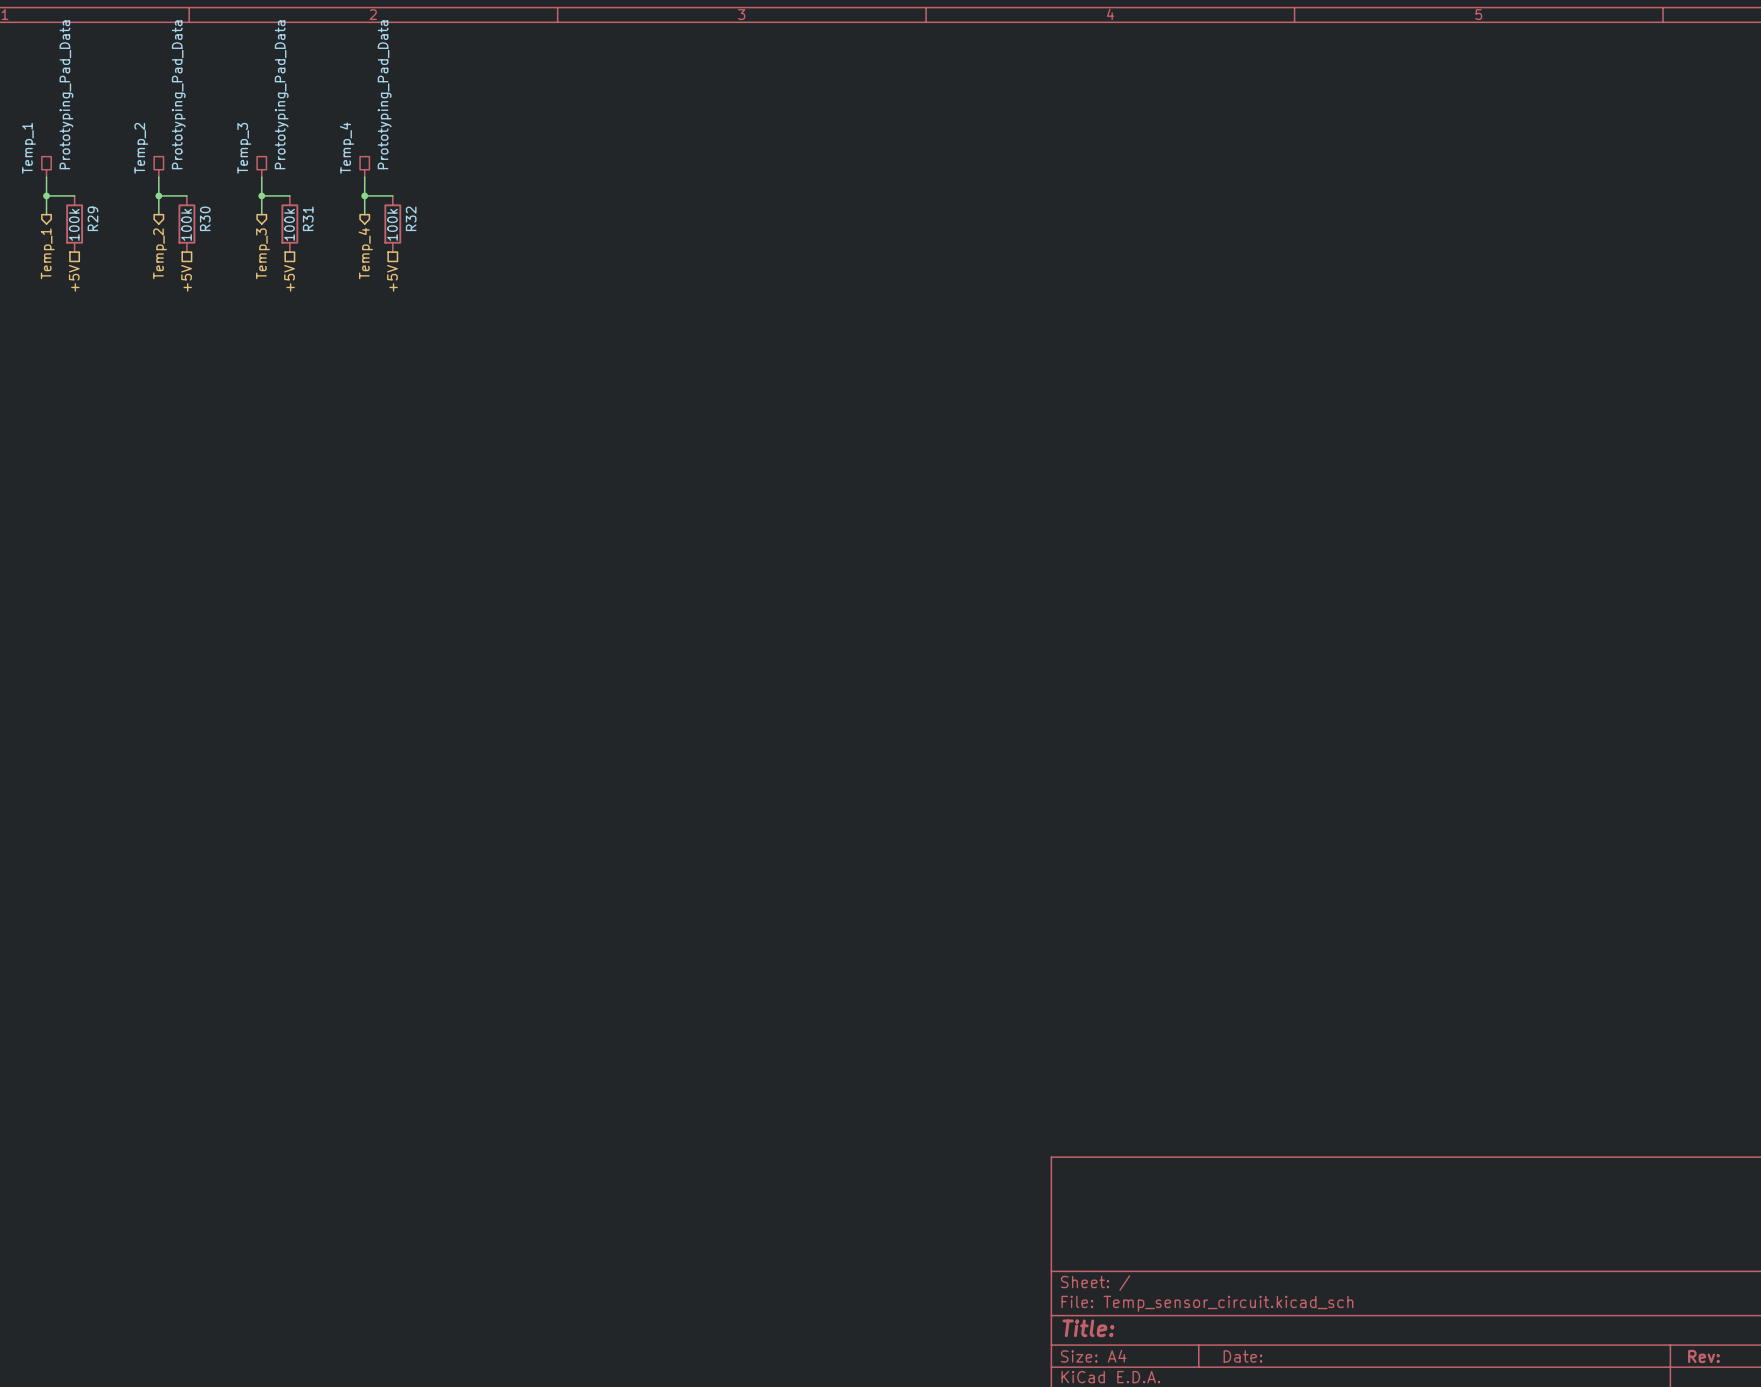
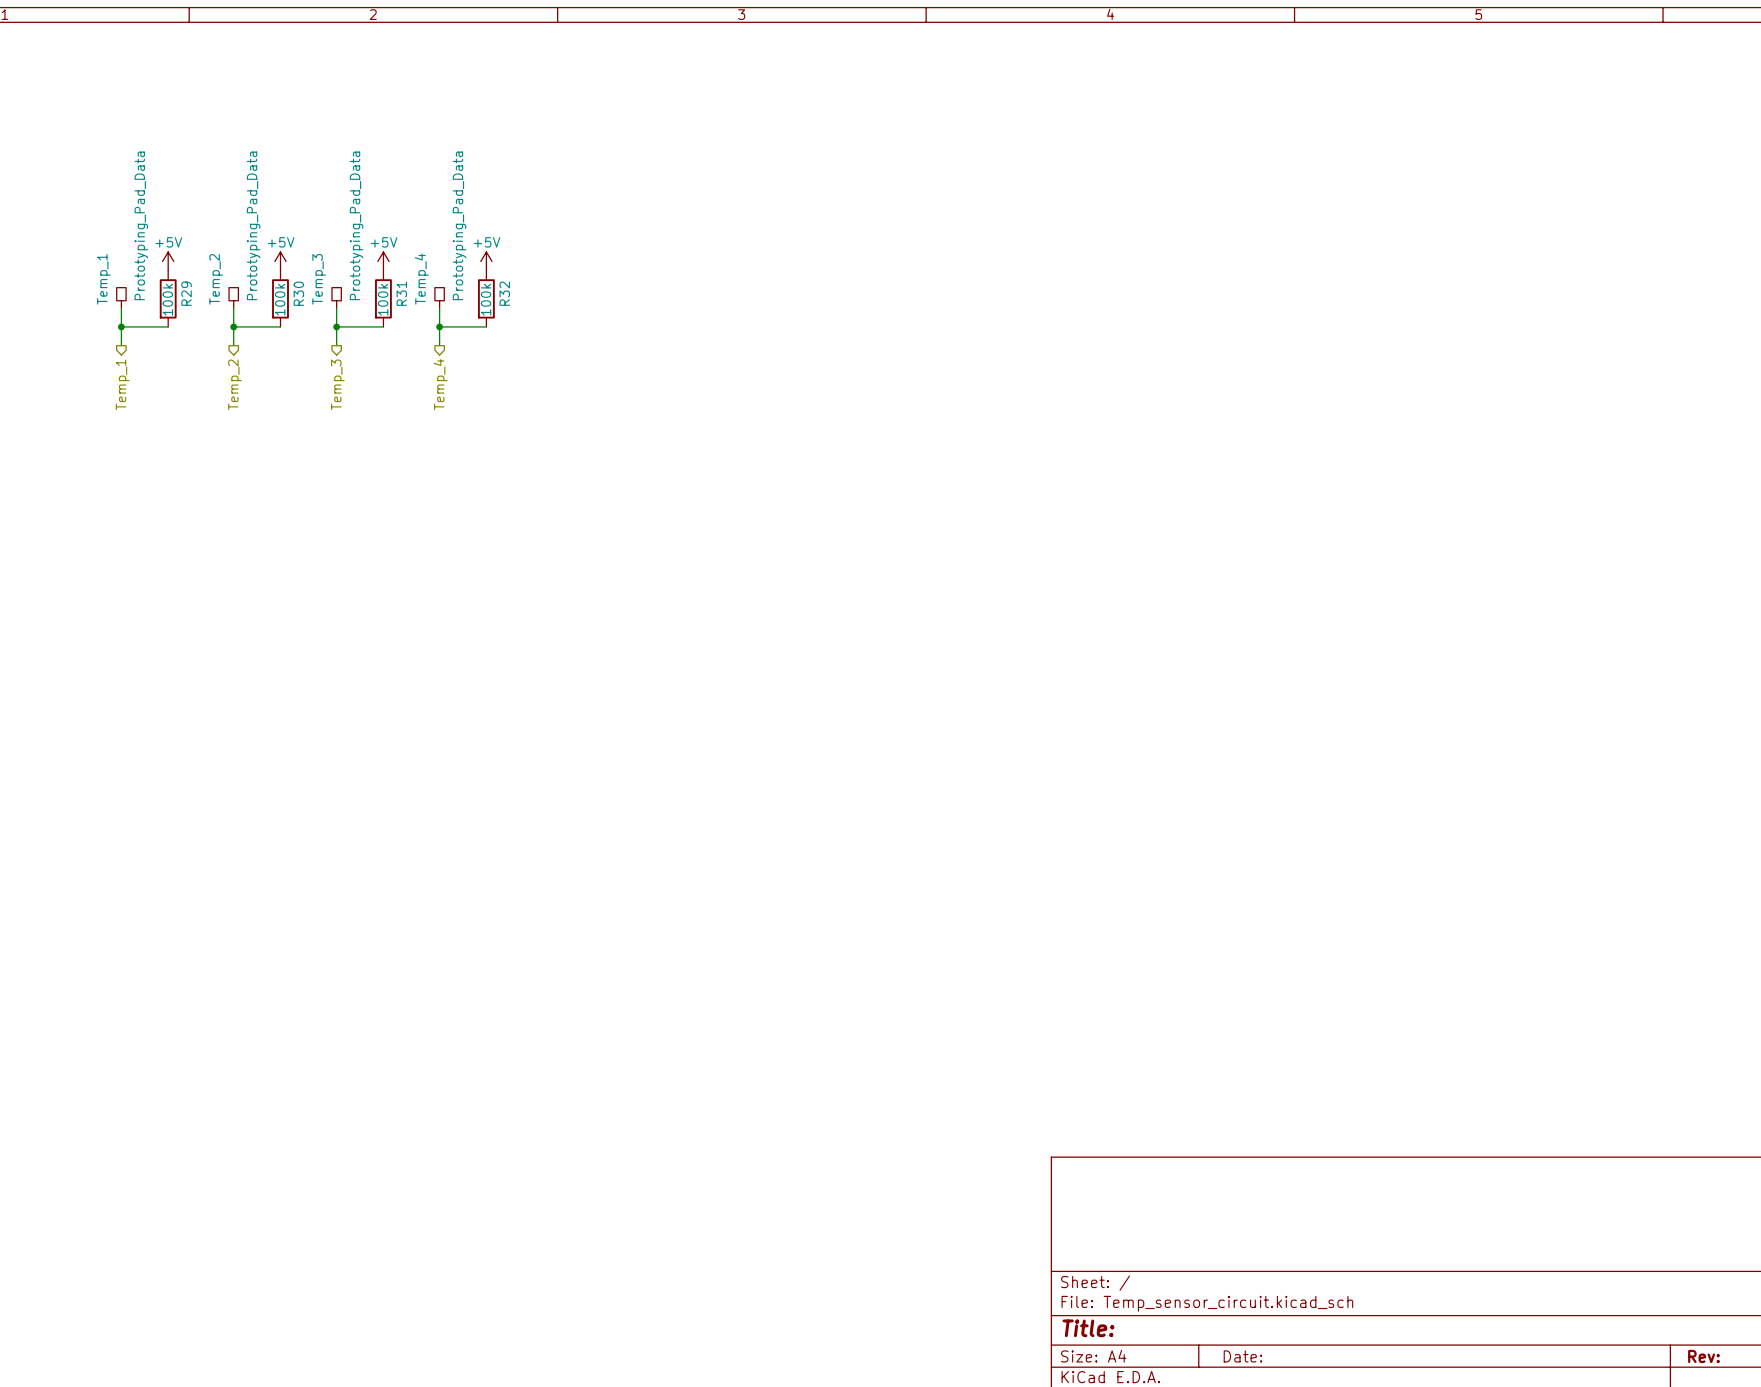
Temp_1 position: (46, 166) -> (121, 297)
Temp_2 position: (158, 166) -> (233, 297)
Temp_3 position: (261, 166) -> (336, 297)
Temp_4 position: (364, 166) -> (439, 297)
wire: (46, 177) (46, 214) -> (121, 308) (121, 345)
wire: (158, 177) (158, 214) -> (233, 308) (233, 345)
wire: (261, 177) (261, 214) -> (336, 308) (336, 345)
wire: (364, 177) (364, 214) -> (439, 308) (439, 345)
wire: (46, 195) (74, 195) -> none
junction: (46, 195) -> none
wire: (158, 195) (186, 195) -> none
junction: (158, 195) -> none
wire: (261, 195) (289, 195) -> none
junction: (261, 195) -> none
wire: (364, 195) (392, 195) -> none
junction: (364, 195) -> none
R29 position: (74, 224) -> (168, 298)
R30 position: (186, 224) -> (280, 298)
R31 position: (289, 224) -> (383, 298)
R32 position: (392, 224) -> (486, 298)
hierarchical label position: Temp_1 (47, 253) -> Temp_1 (122, 384)
hierarchical label position: Temp_2 (160, 253) -> Temp_2 (234, 384)
hierarchical label position: Temp_3 (262, 253) -> Temp_3 (337, 384)
hierarchical label position: Temp_4 (365, 253) -> Temp_4 (440, 384)
power symbol: none -> +5V (168, 261)
power symbol: none -> +5V (280, 261)
power symbol: none -> +5V (383, 261)
power symbol: none -> +5V (486, 261)
hierarchical label: +5V (74, 278) -> none
hierarchical label: +5V (186, 278) -> none
hierarchical label: +5V (289, 278) -> none
hierarchical label: +5V (392, 278) -> none
wire: none -> (121, 326) (168, 326)
junction: none -> (121, 326)
wire: none -> (233, 326) (280, 326)
junction: none -> (233, 326)
wire: none -> (336, 326) (383, 326)
junction: none -> (336, 326)
wire: none -> (439, 326) (486, 326)
junction: none -> (439, 326)

